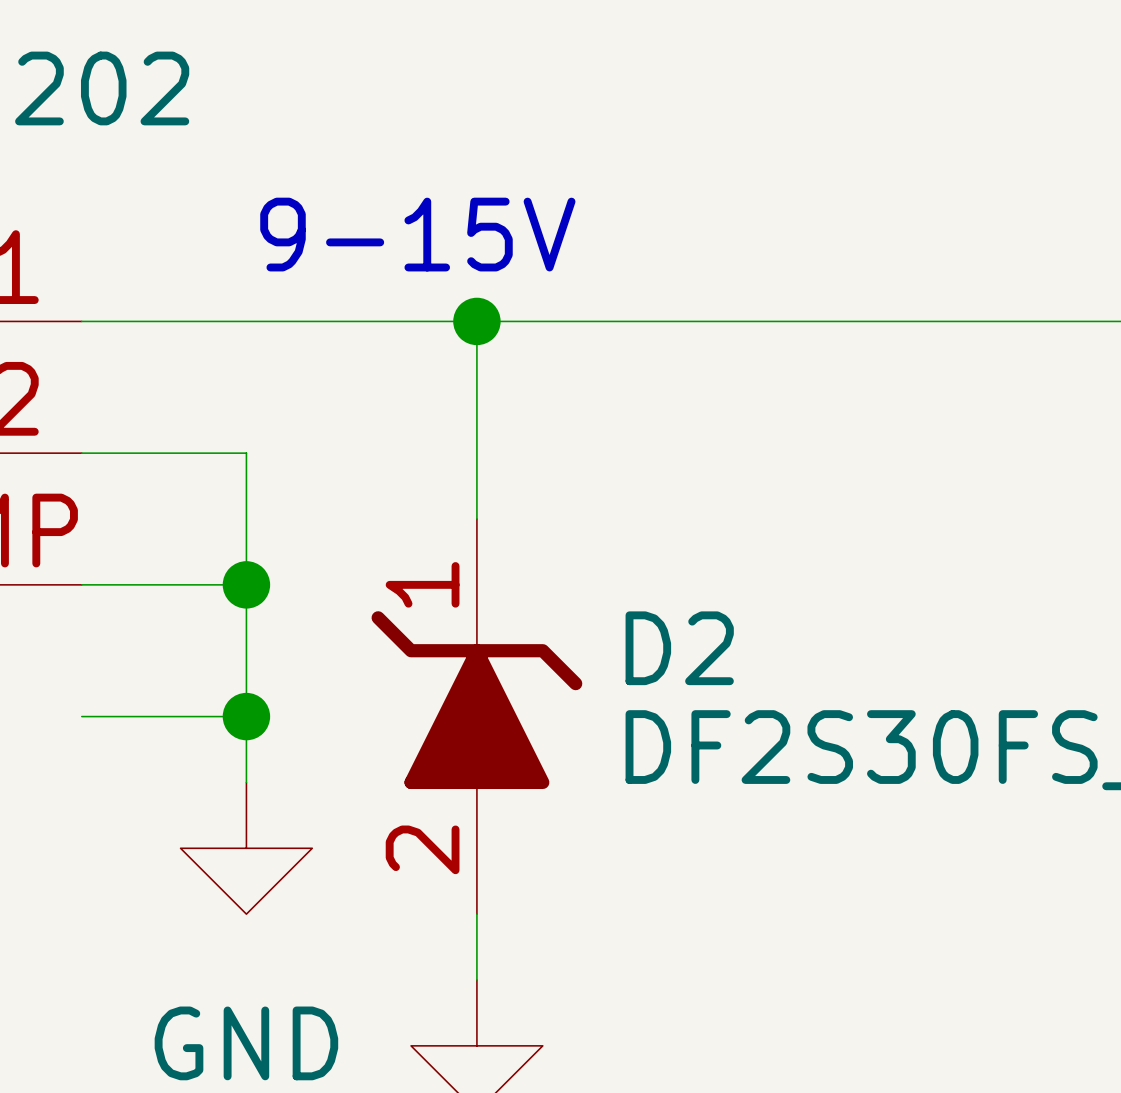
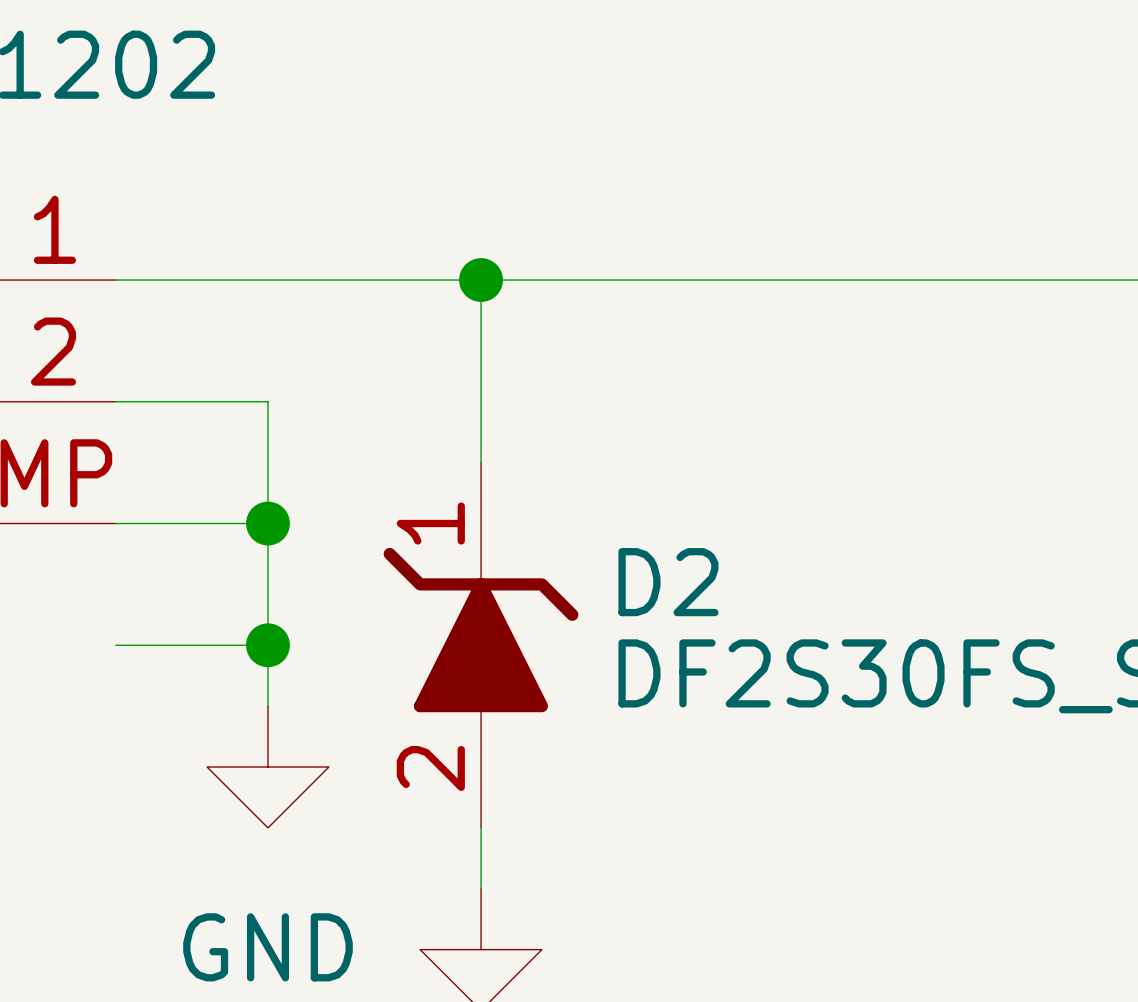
text: 9-15V (417, 234) -> none

